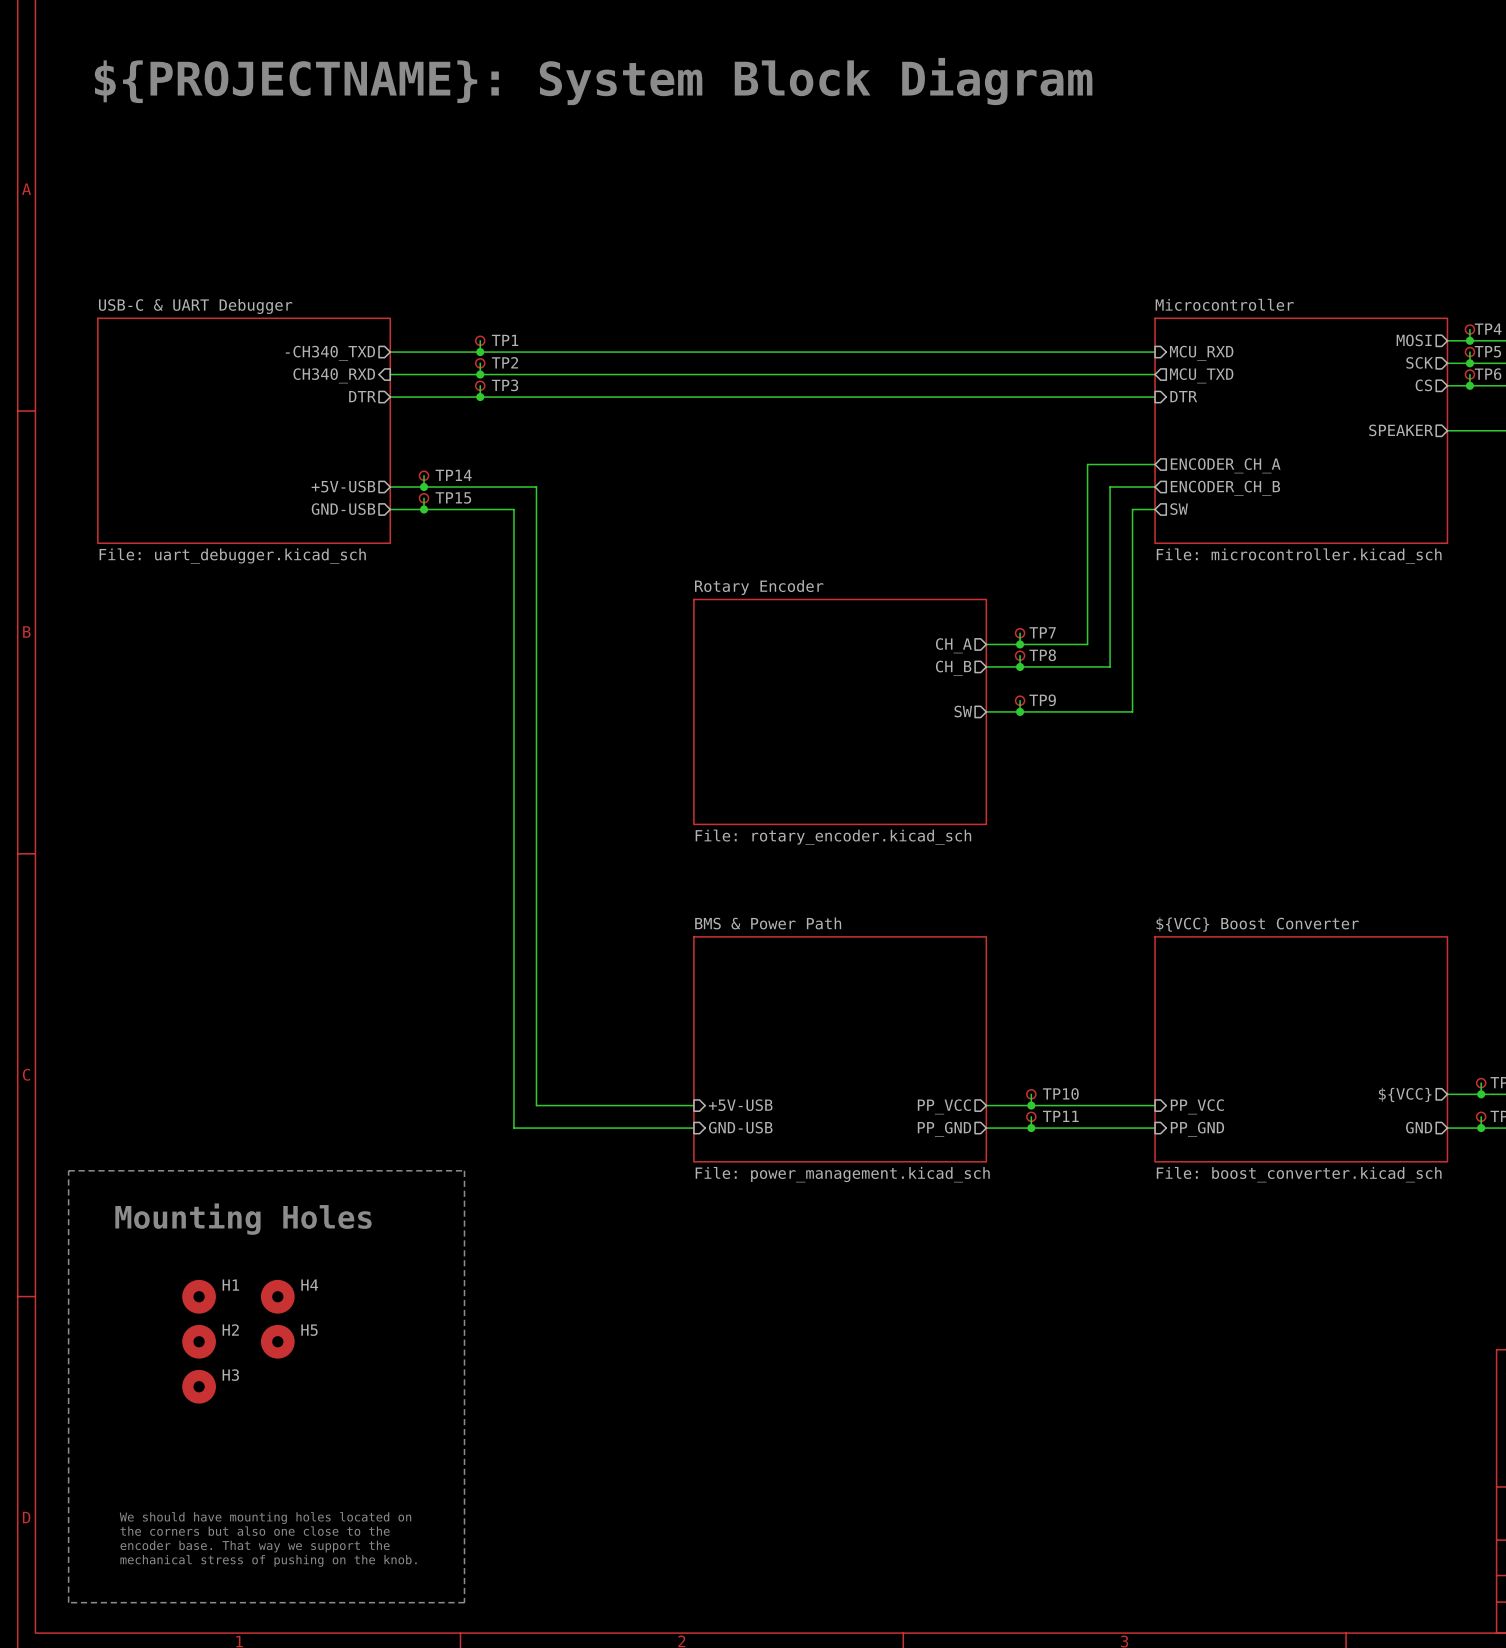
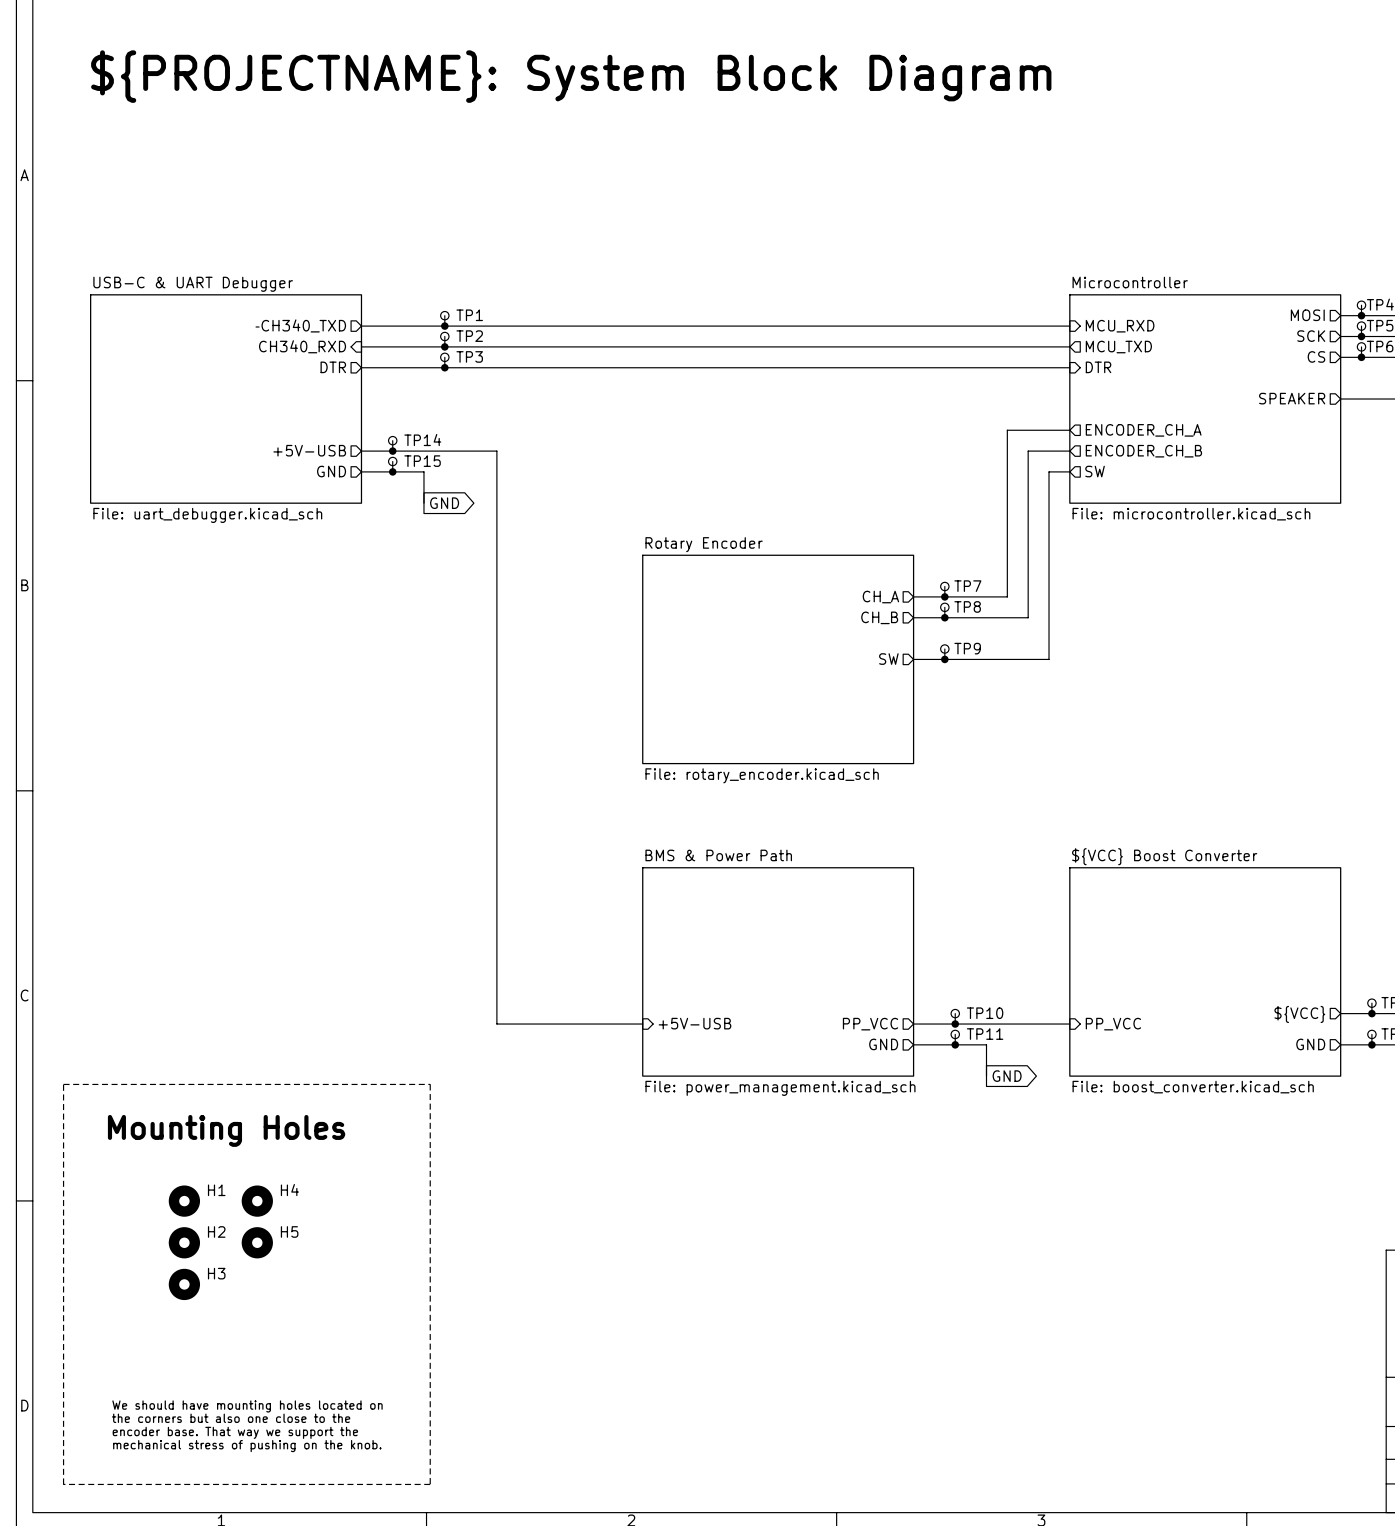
sheet pin: GND-USB (343, 509) -> GND (331, 471)
wire: (457, 509) (513, 509) (513, 1128) (693, 1128) -> (423, 471) (423, 503)
global label: none -> GND (444, 503)
sheet pin: GND-USB (740, 1127) -> none
wire: (1065, 1128) (1155, 1128) -> (986, 1044) (986, 1076)
sheet pin: PP_GND (944, 1129) -> GND (883, 1044)
sheet pin: PP_GND (1197, 1129) -> none
global label: none -> GND (1007, 1076)

